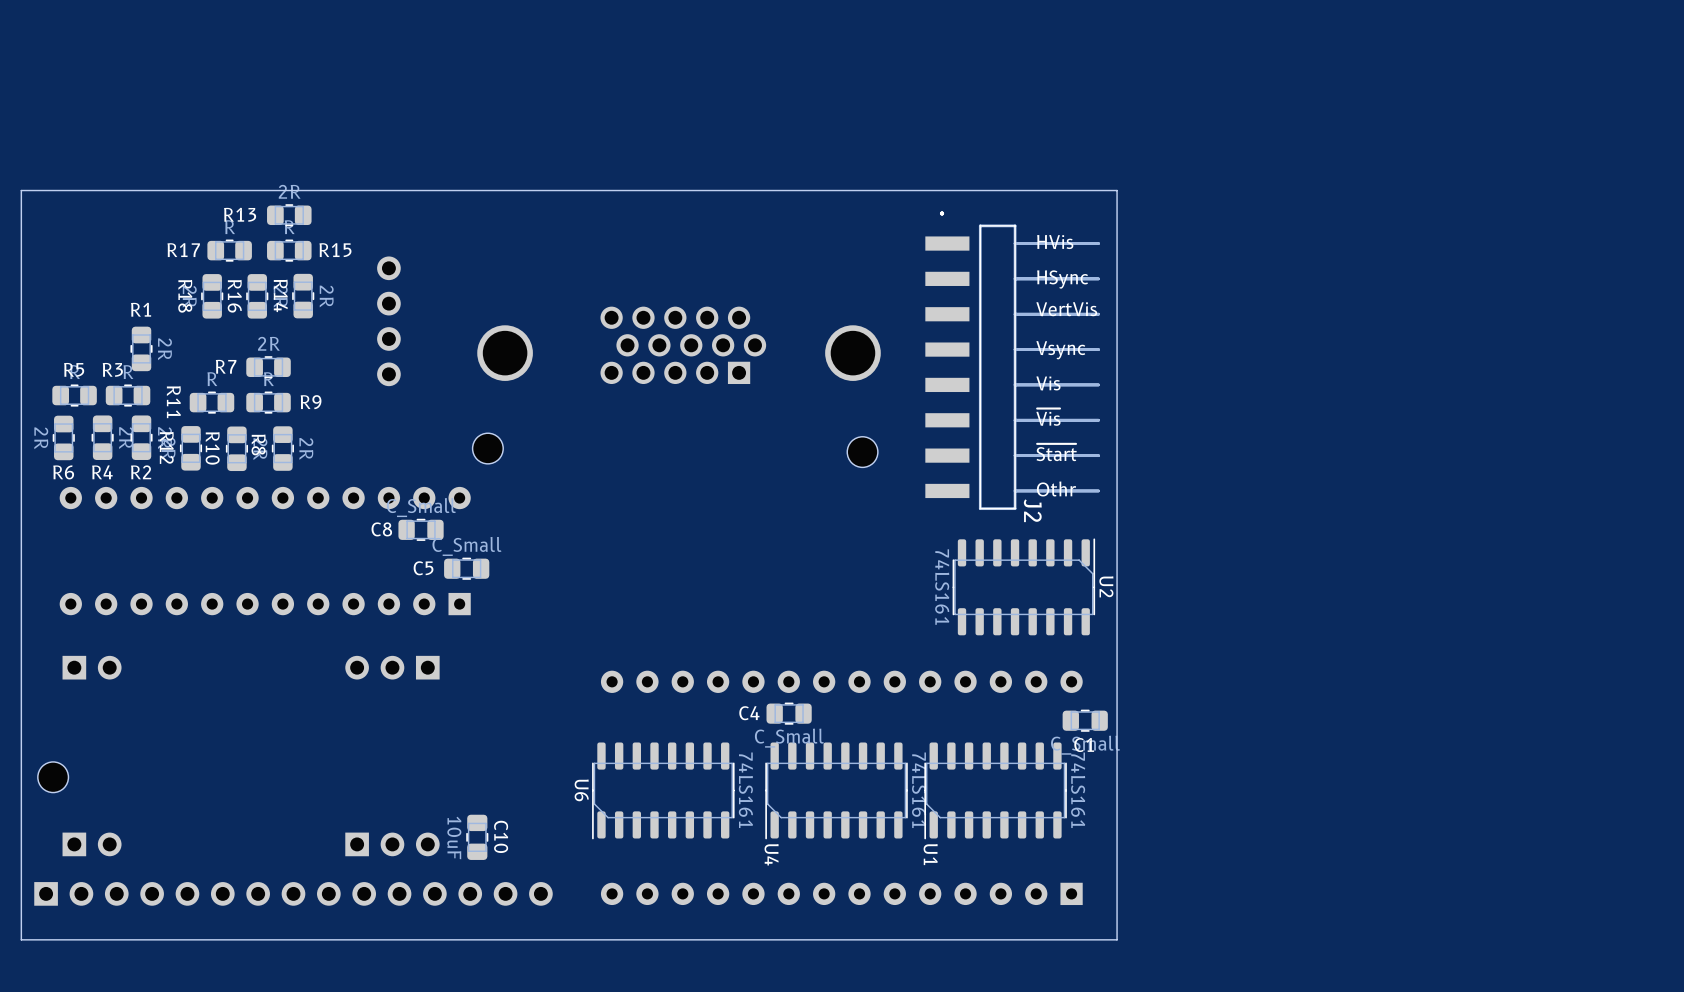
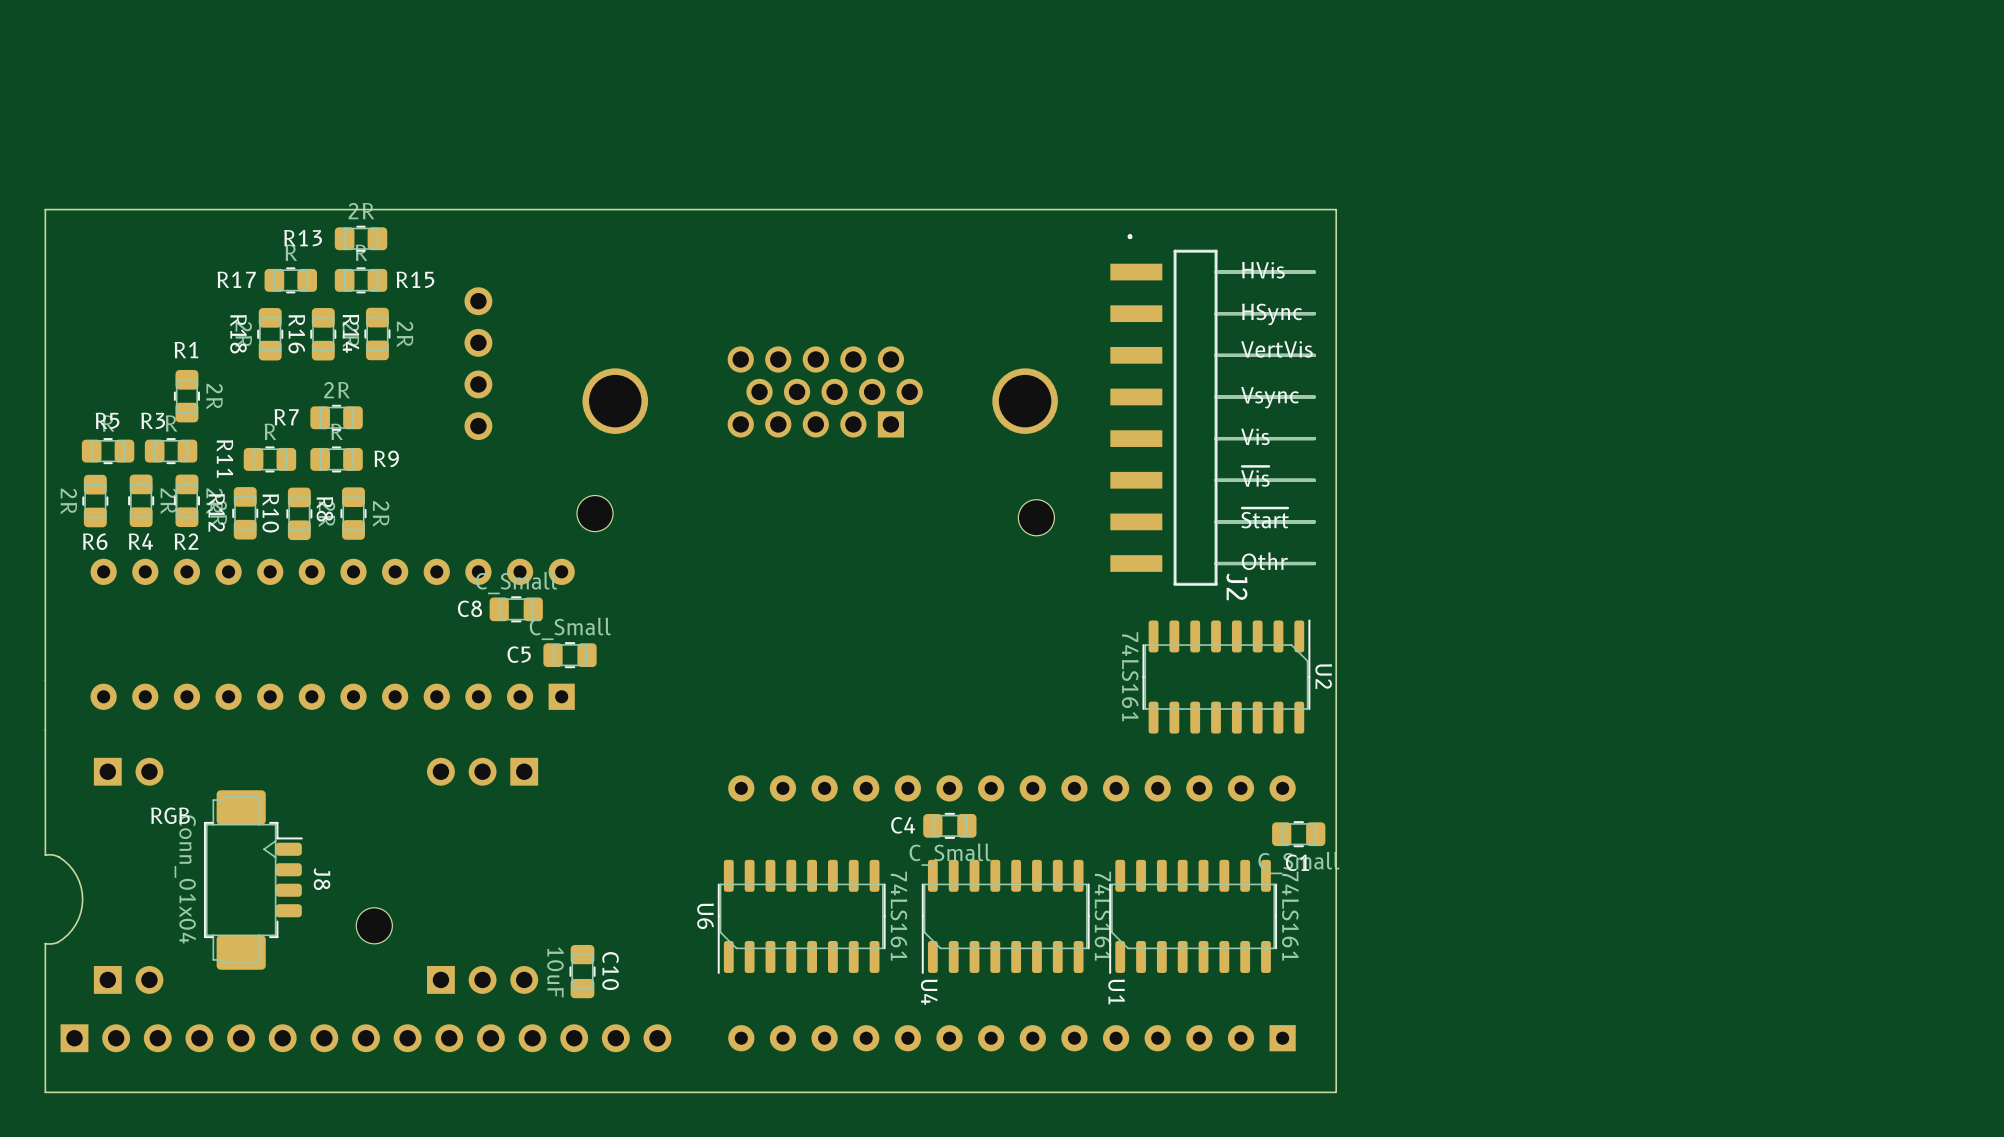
board edge: (21, 632) (21, 813) -> (45, 730) (45, 855) (59, 857) (73, 870) (81, 887) (82, 900) (80, 912) (72, 929) (57, 942) (45, 943)
text: none -> RGB (170, 815)
J8: none -> Conn_01x04 (253, 880)
part position: (53, 777) -> (374, 925)

